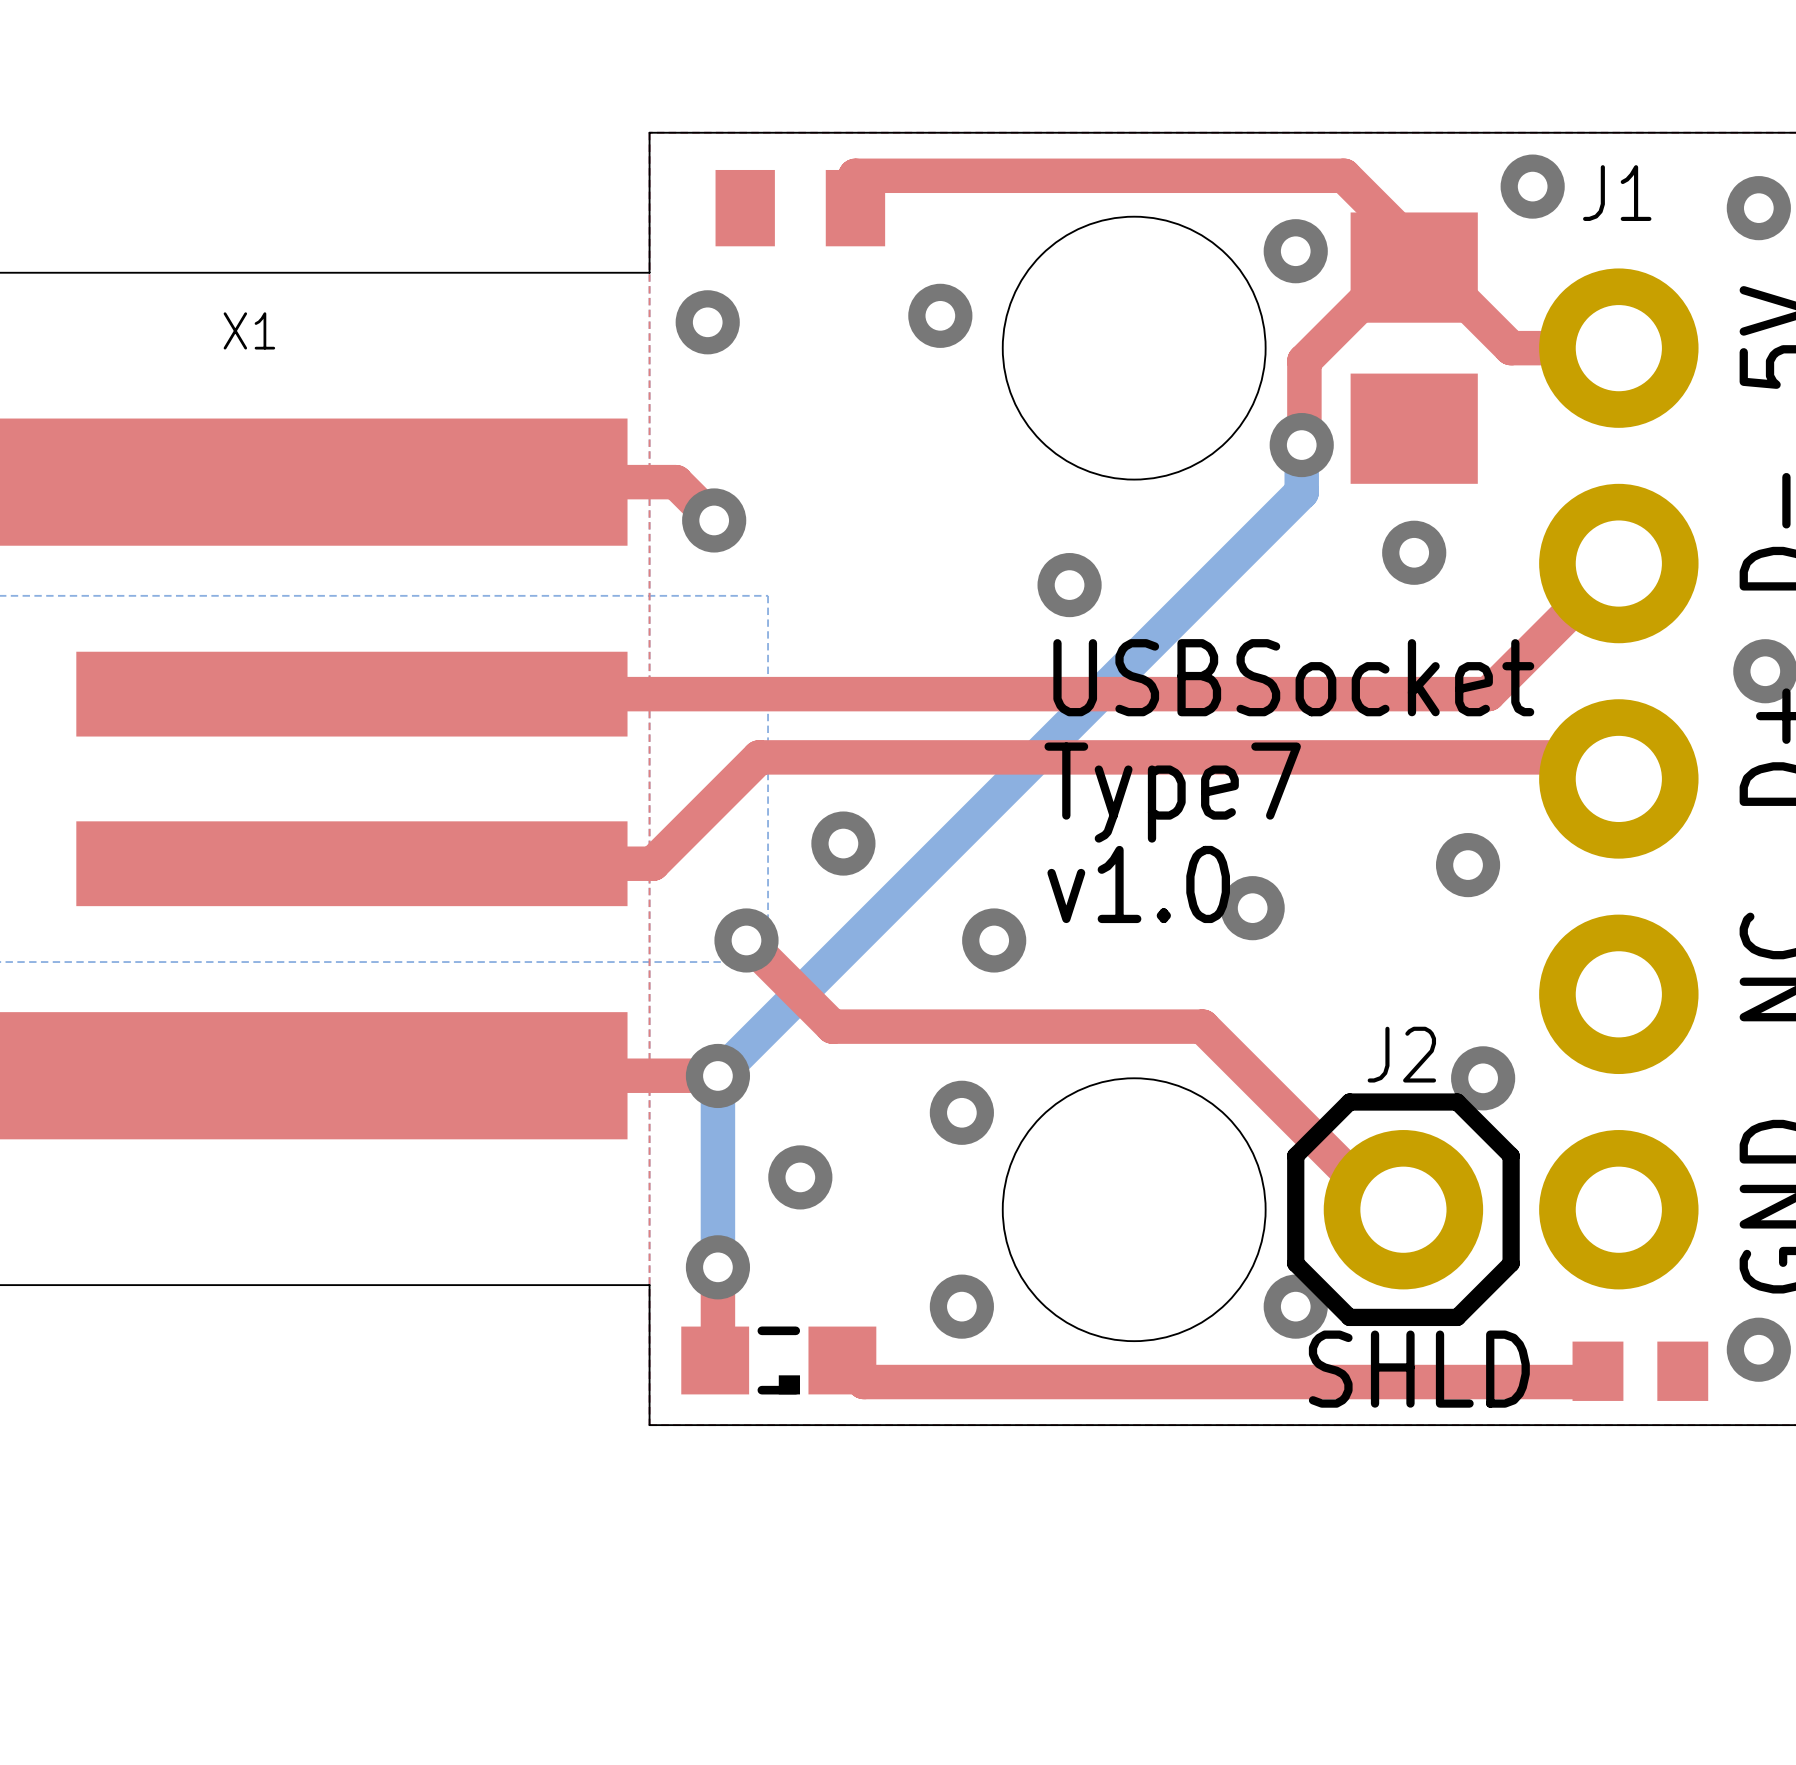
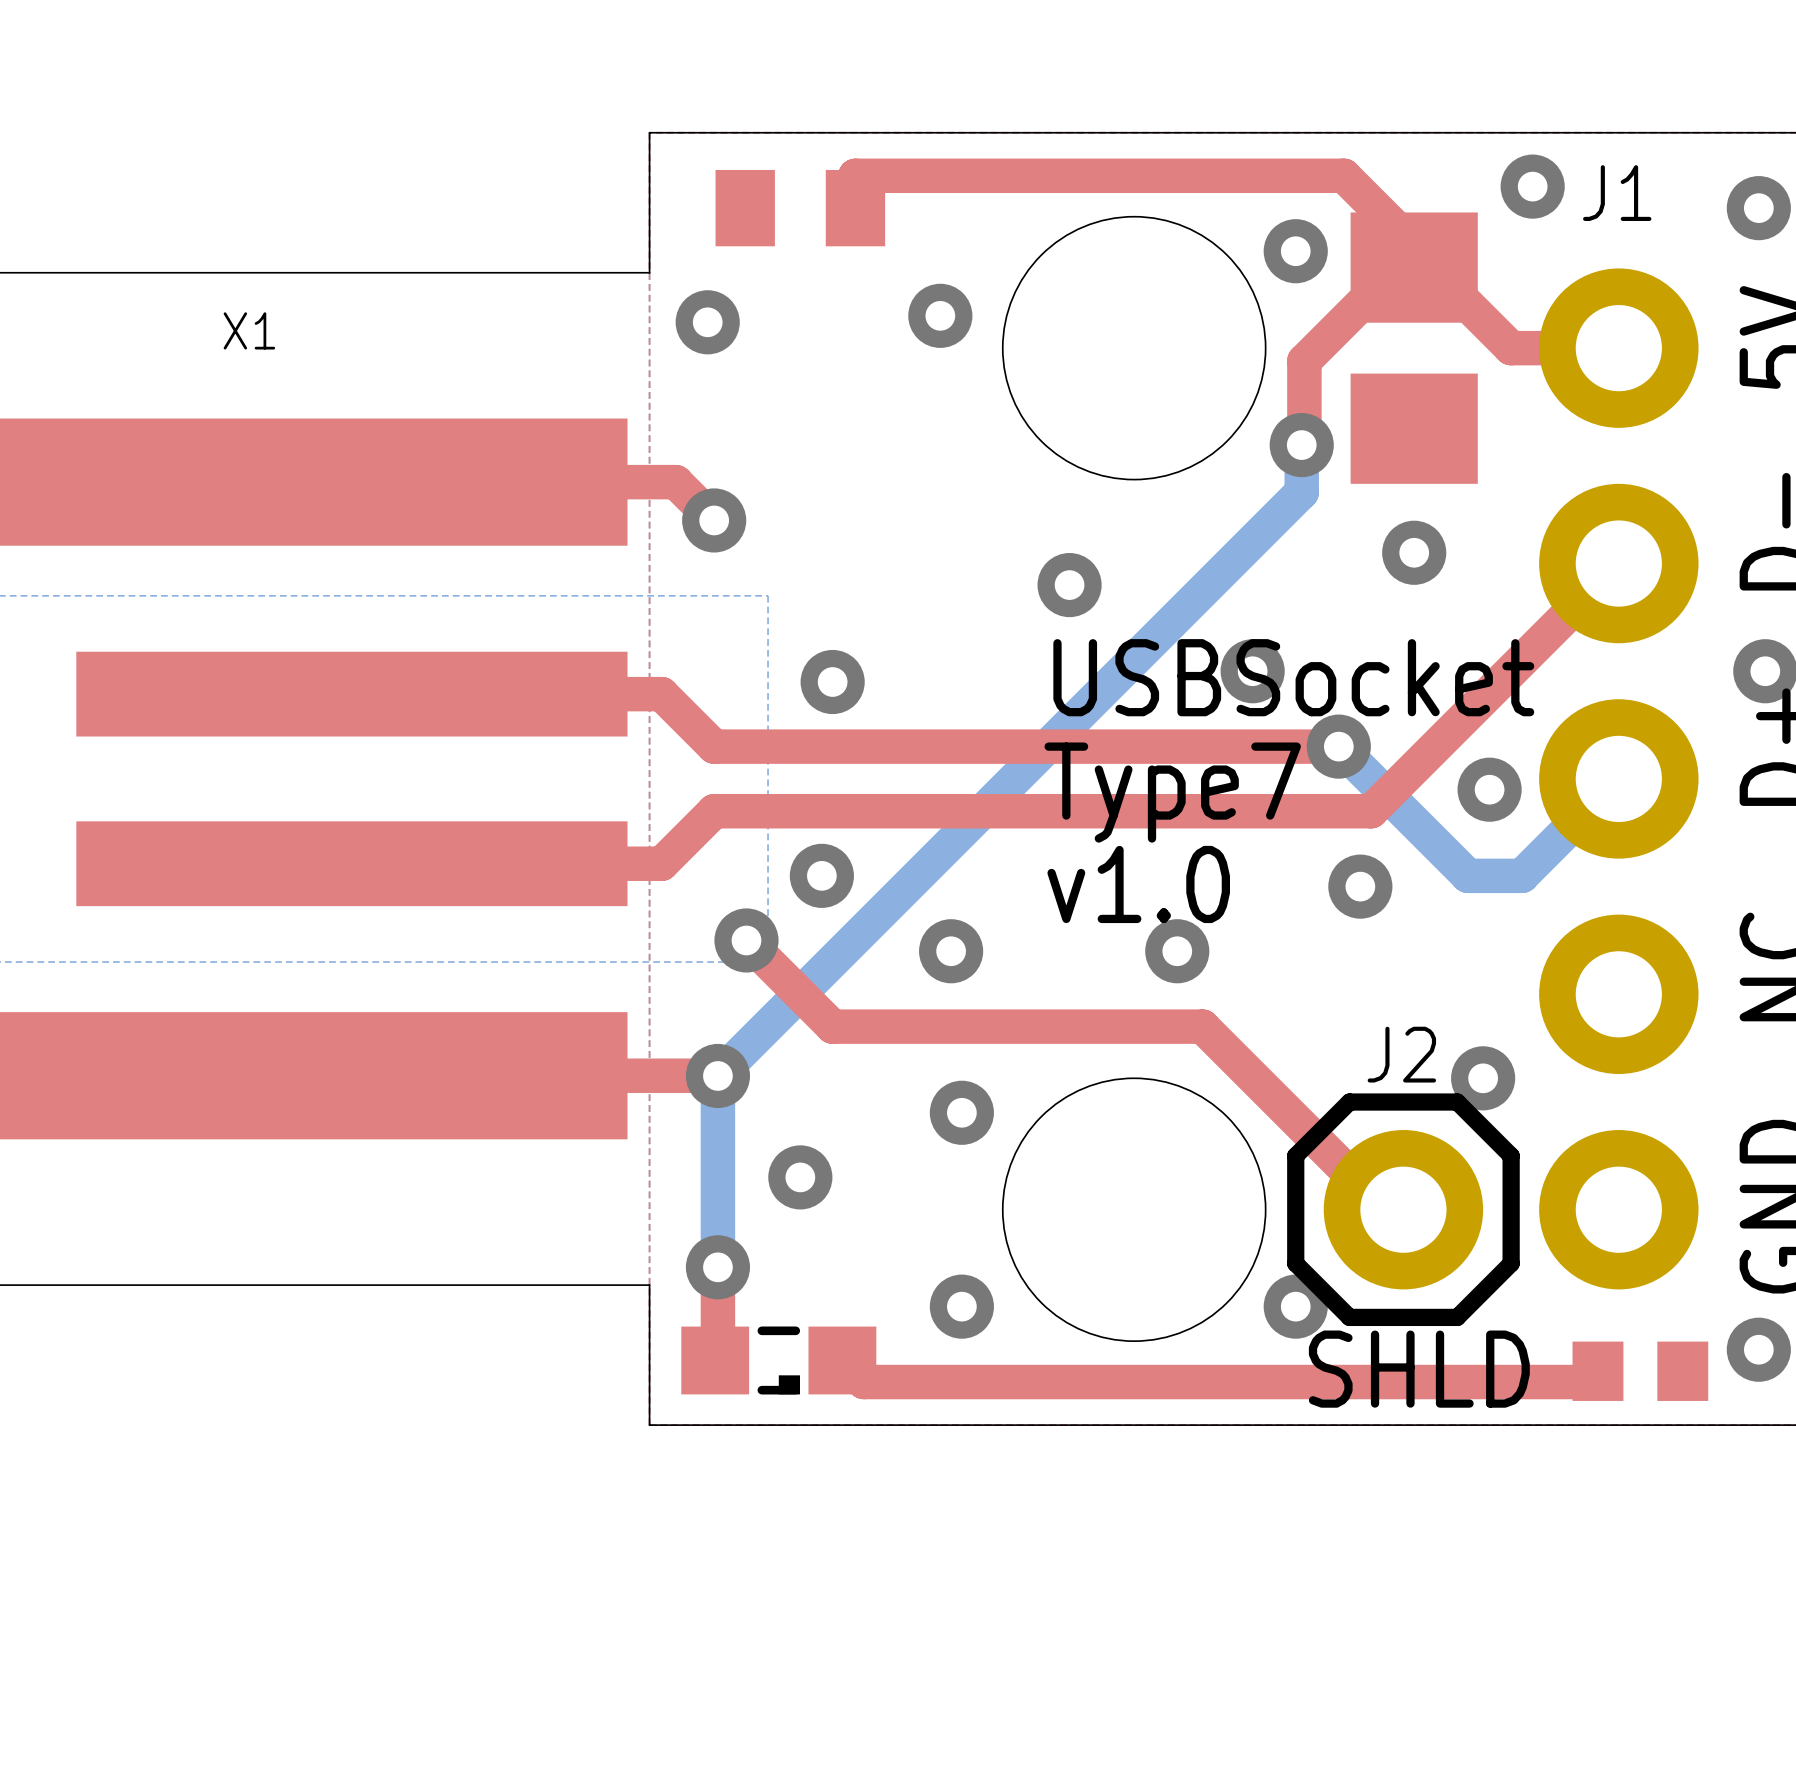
via: none -> (1252, 671)
via: none -> (832, 682)
top track: (661, 694) (1488, 694) -> (661, 694) (714, 746) (1338, 746)
bottom track: none -> (1338, 746) (1468, 875) (1521, 875) (1618, 778)
via: none -> (1338, 746)
top track: (1618, 778) (1597, 757) (759, 757) (652, 863) -> (1488, 694) (1371, 811) (714, 811) (661, 863) (652, 863)
via: none -> (1489, 789)
via position: (843, 843) -> (821, 875)
via: (1468, 865) -> none
via: none -> (1360, 886)
via: (1252, 908) -> none
via position: (994, 940) -> (951, 951)
via: none -> (1177, 951)

